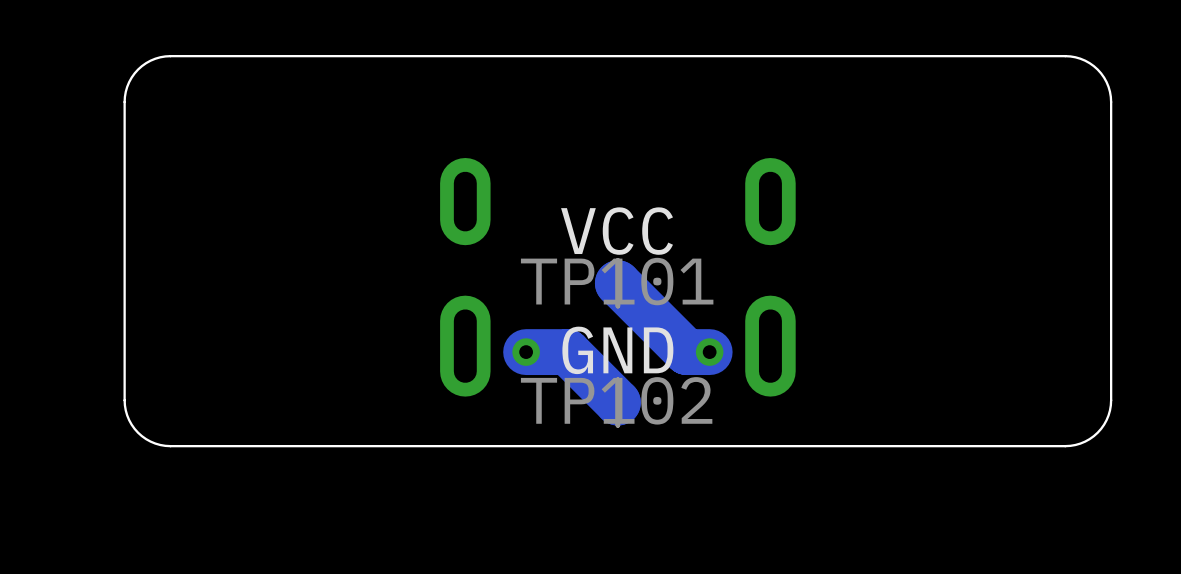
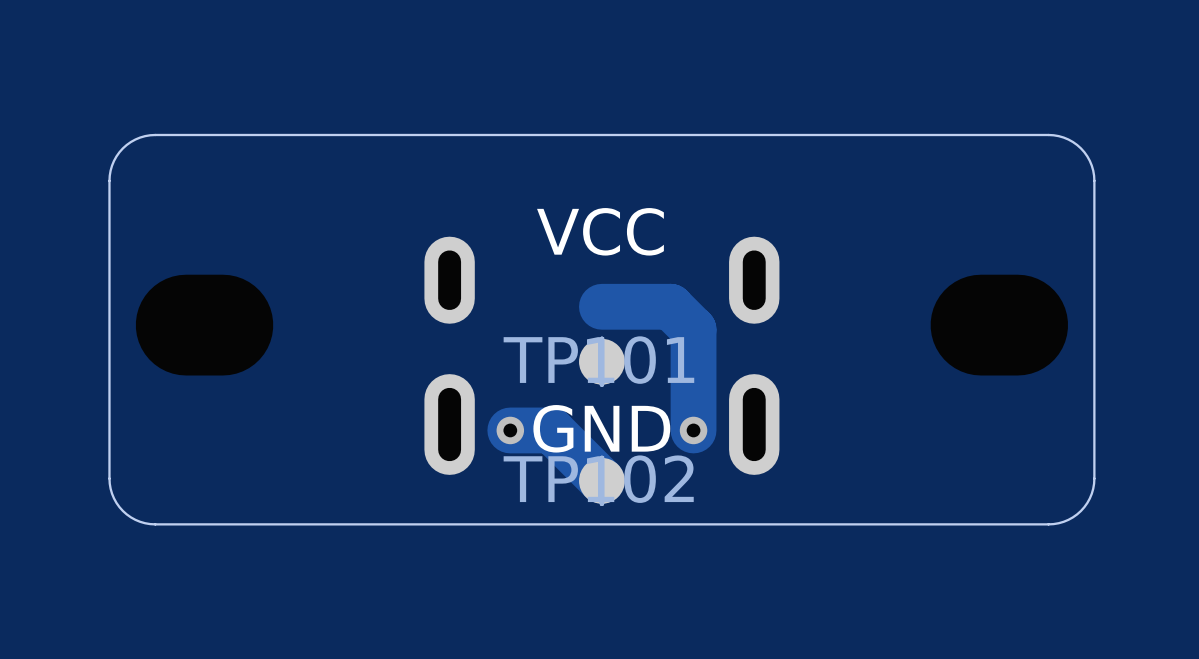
text position: VCC (617, 231) -> VCC (600, 231)
track: (617, 283) (686, 352) (709, 352) -> (601, 306) (670, 306) (693, 329) (693, 430)

